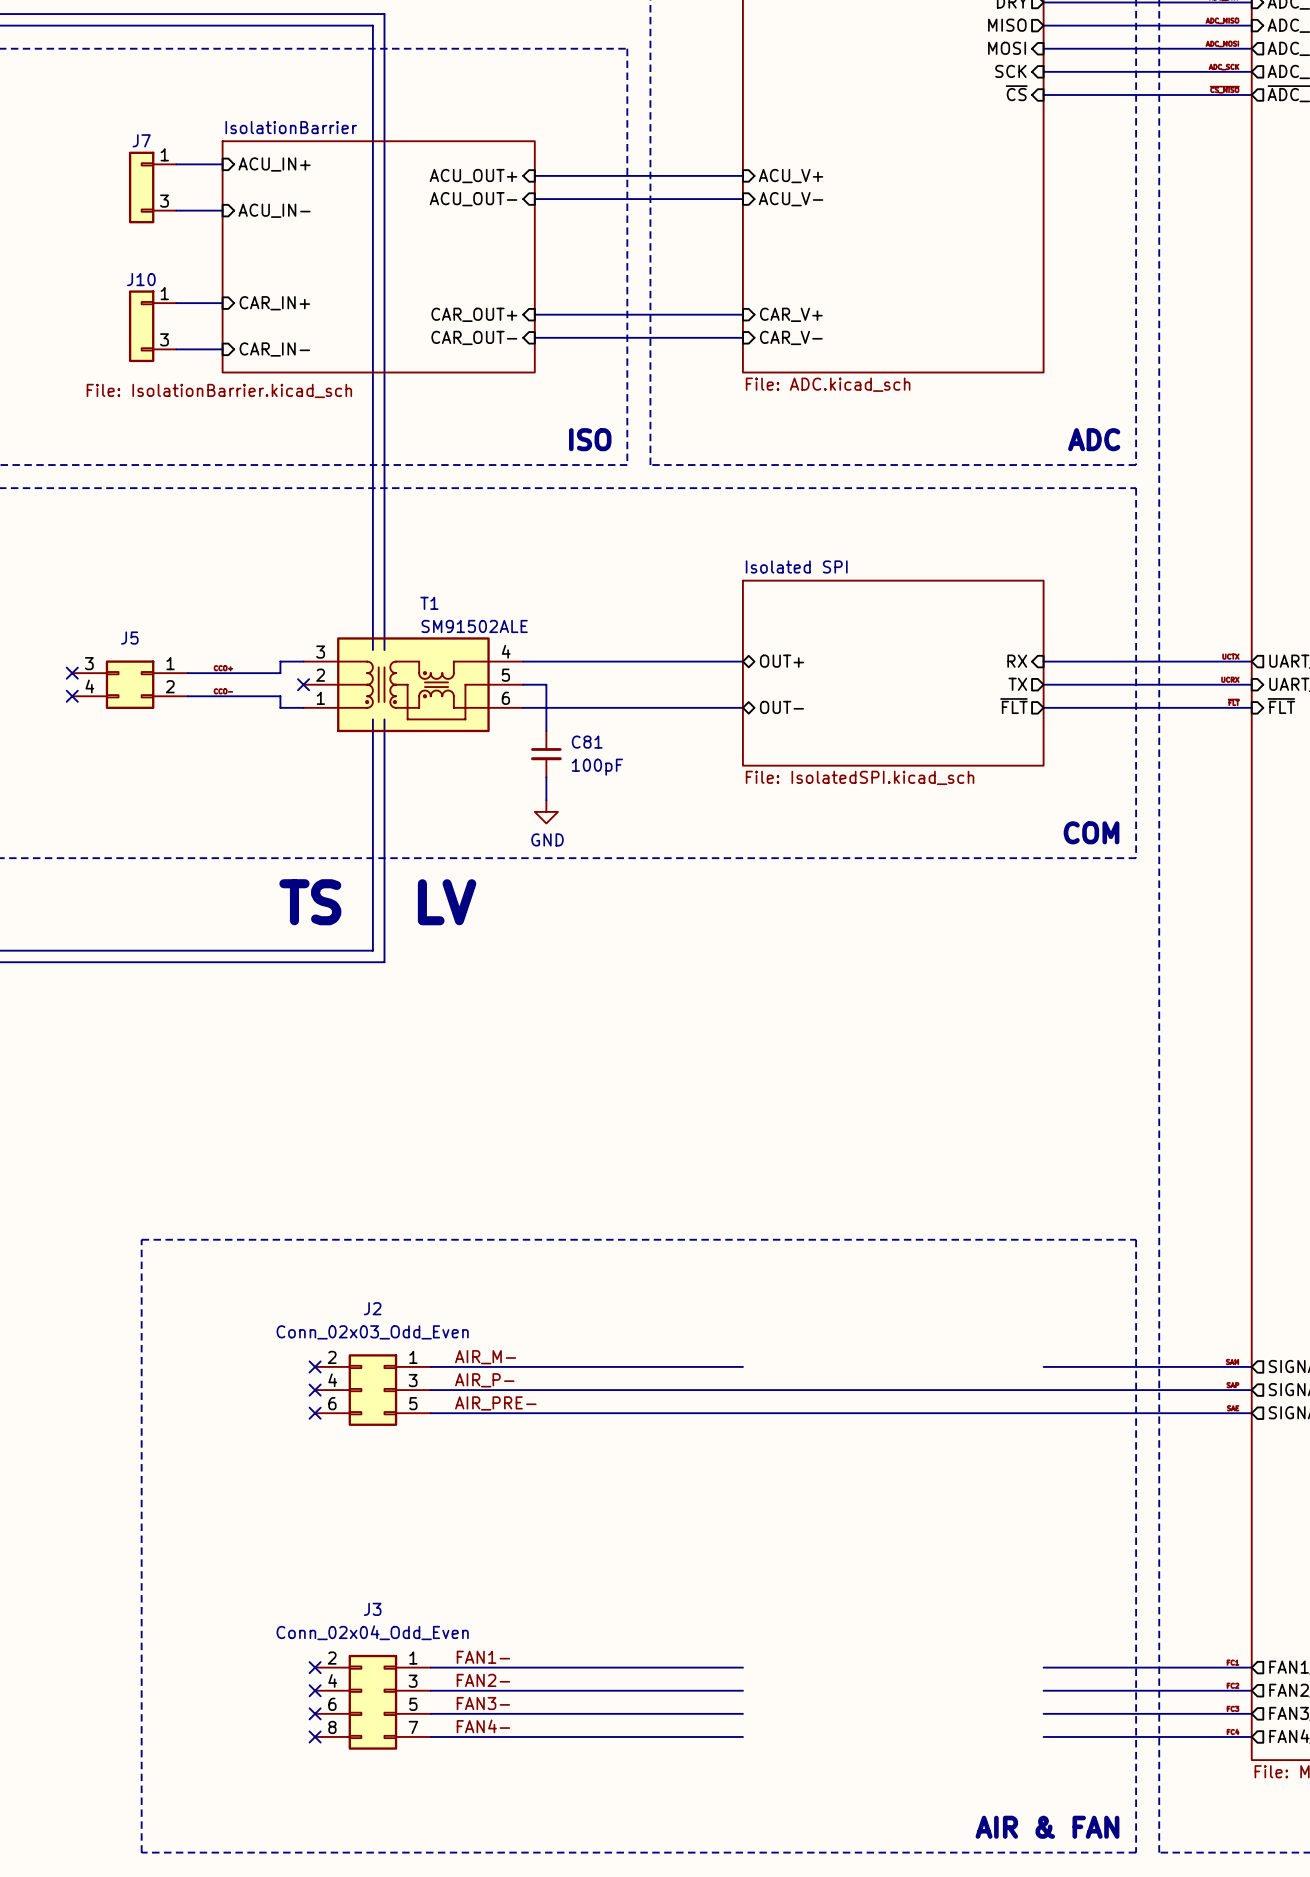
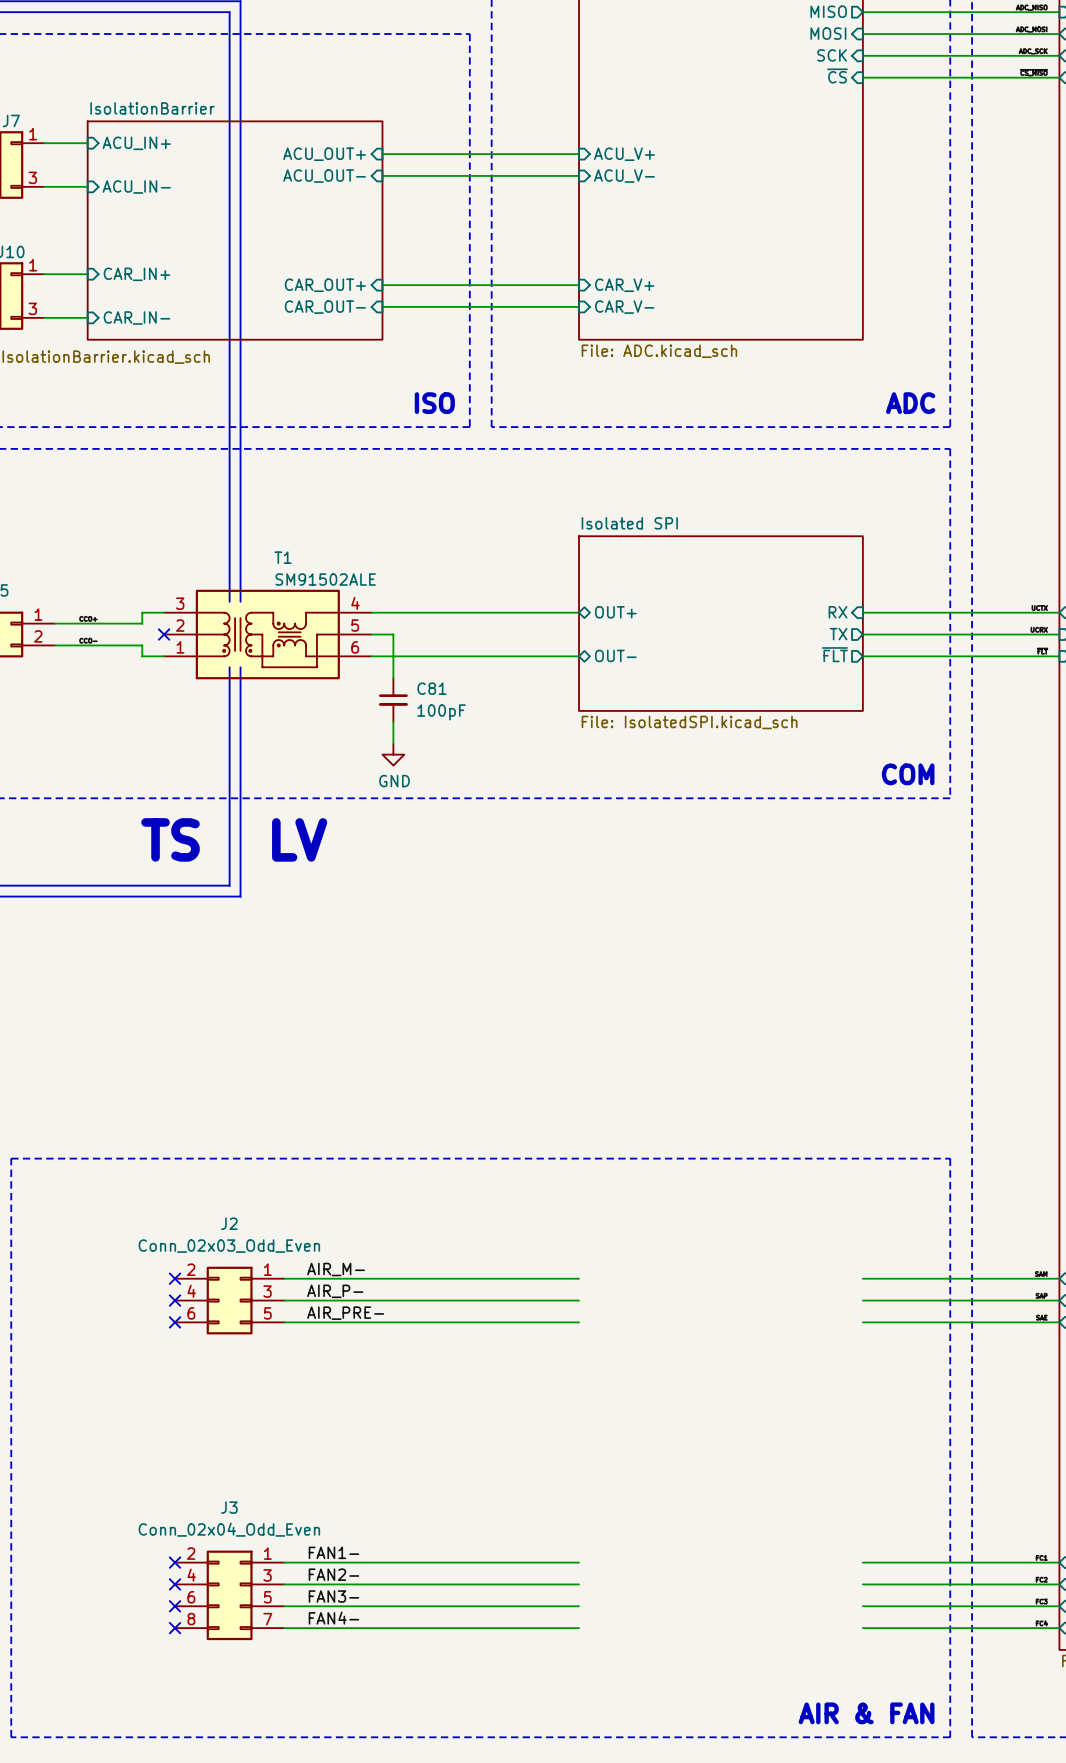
wire: (742, 1390) (1043, 1390) -> none
wire: (742, 1413) (1043, 1413) -> none

